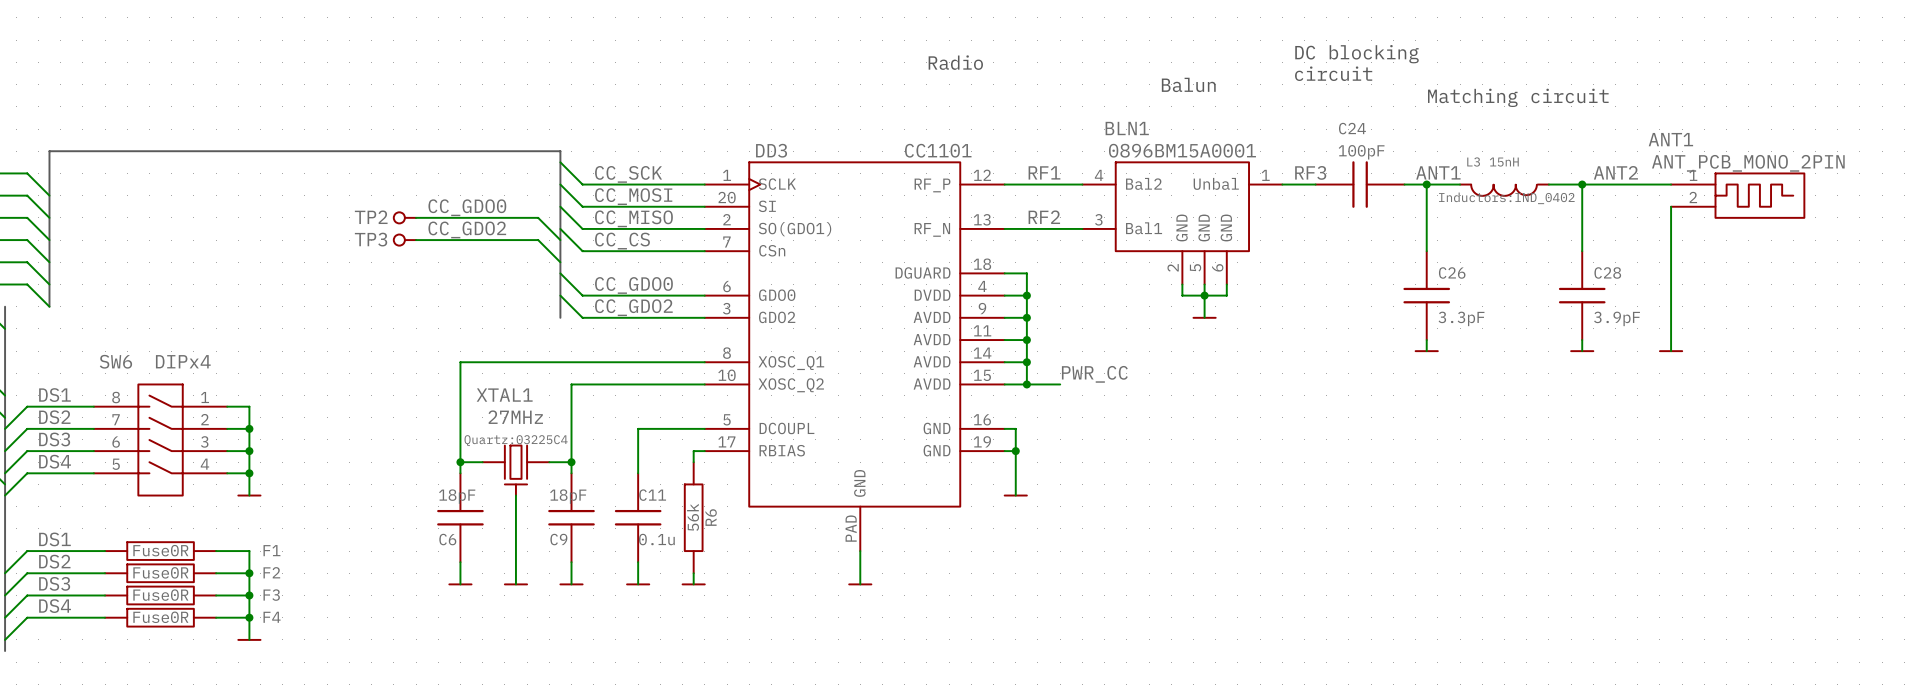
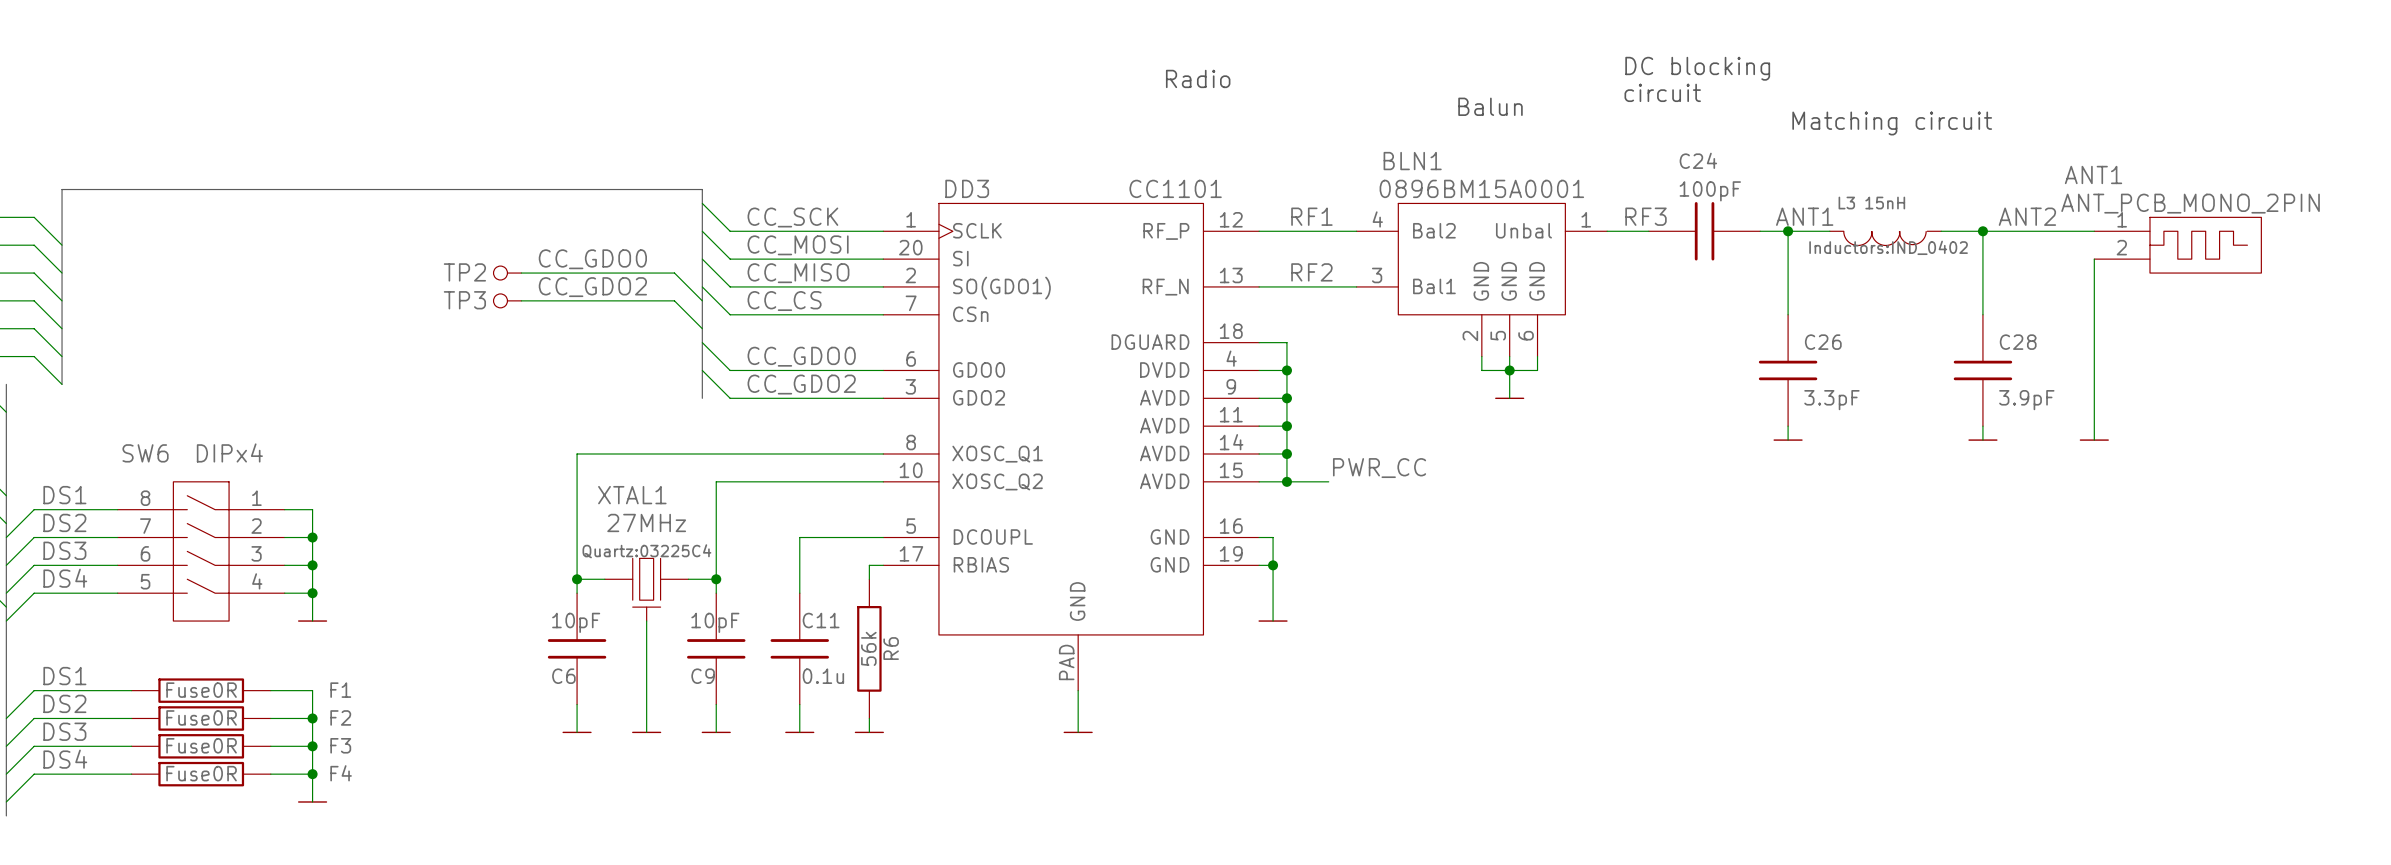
C6 value: 18pF (457, 496) -> 10pF (576, 622)
C9 value: 18pF (568, 496) -> 10pF (715, 622)

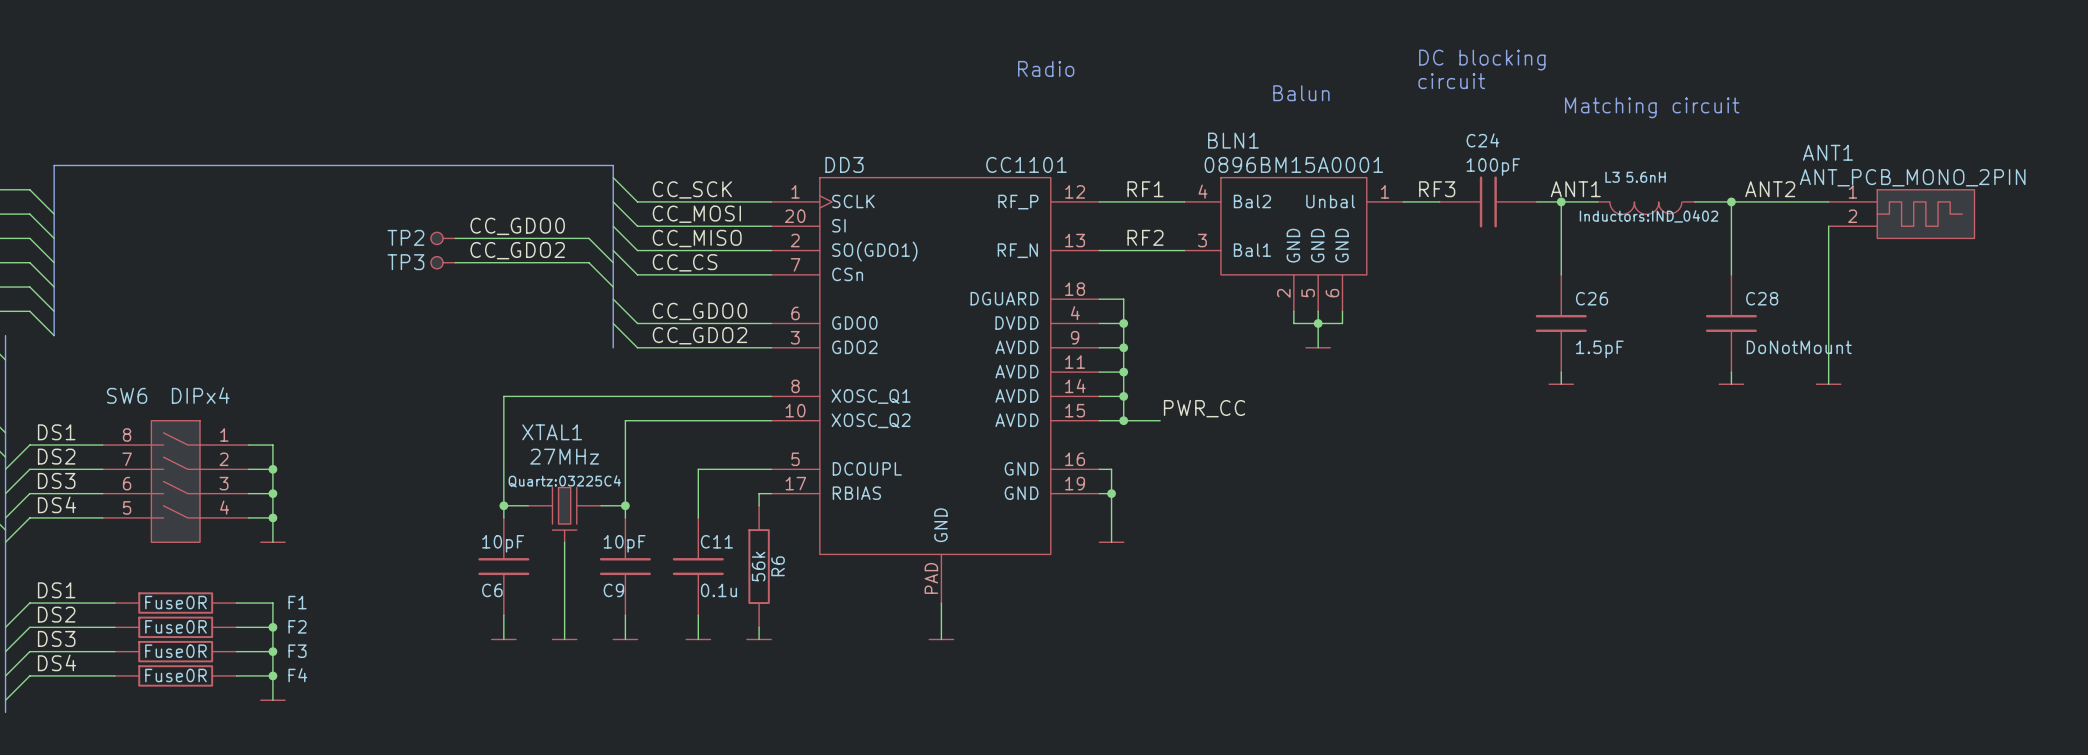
L3 value: 15nH (1885, 203) -> 5.6nH (1646, 177)
C26 value: 3.3pF (1831, 400) -> 1.5pF (1599, 349)
C28 value: 3.9pF (2026, 400) -> DoNotMount (1799, 347)

